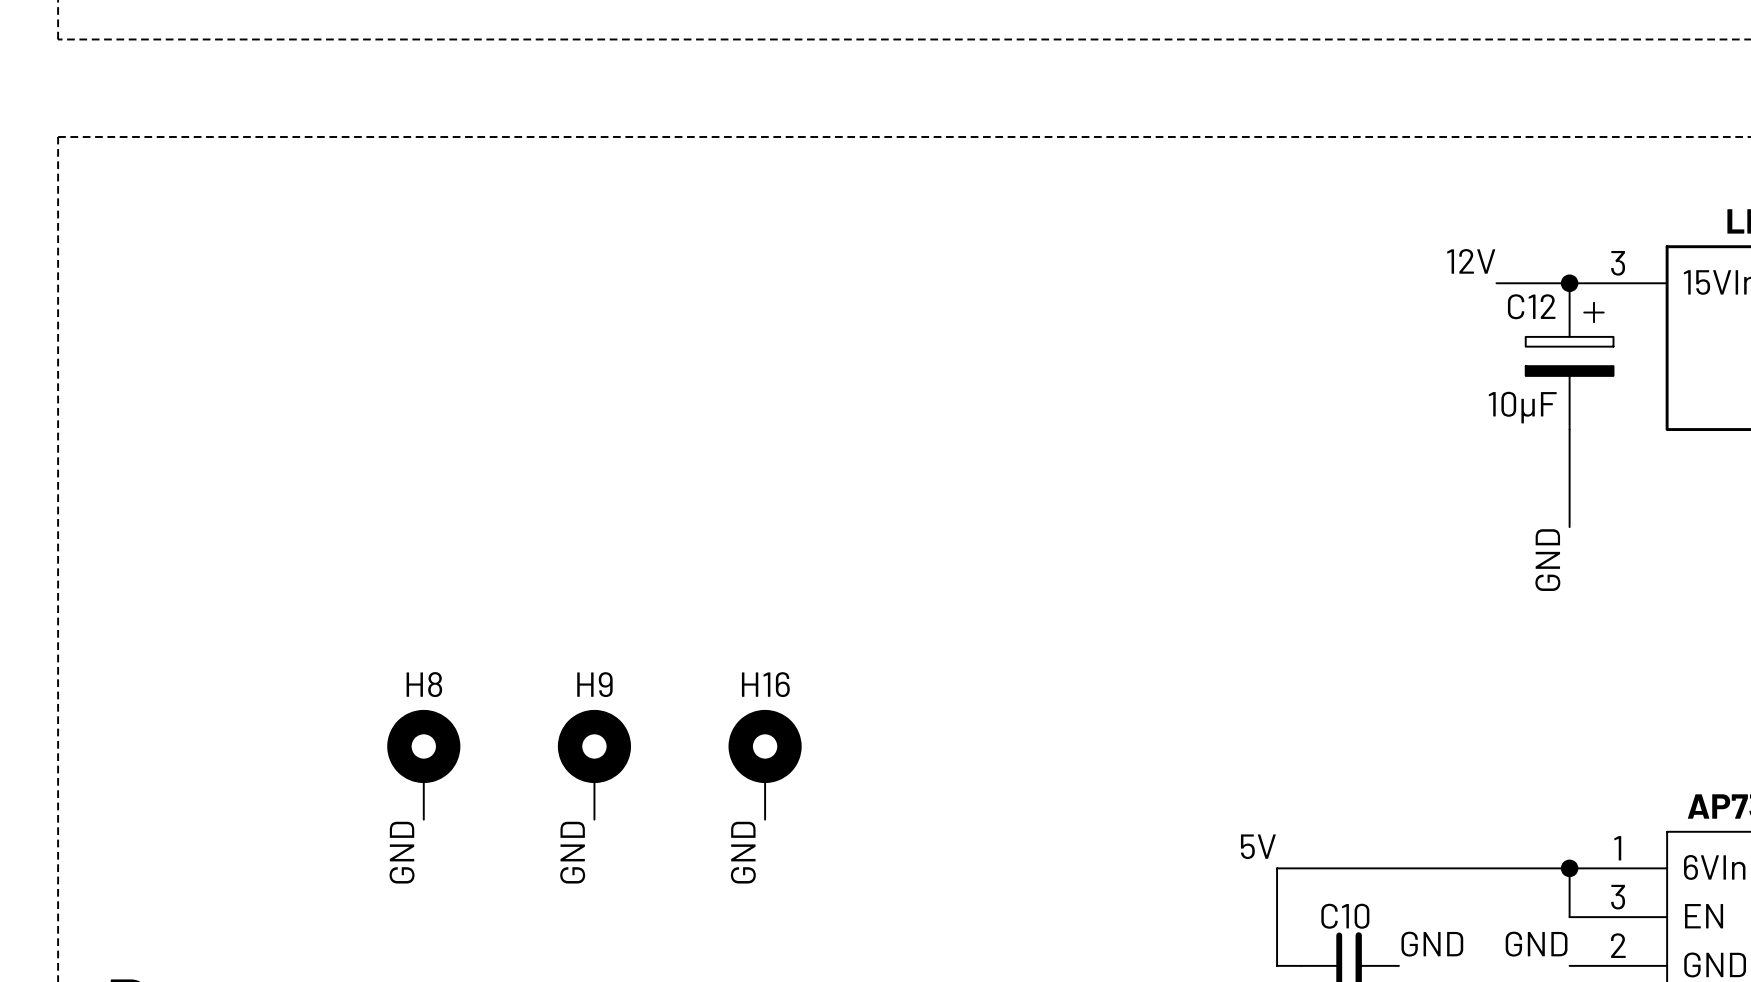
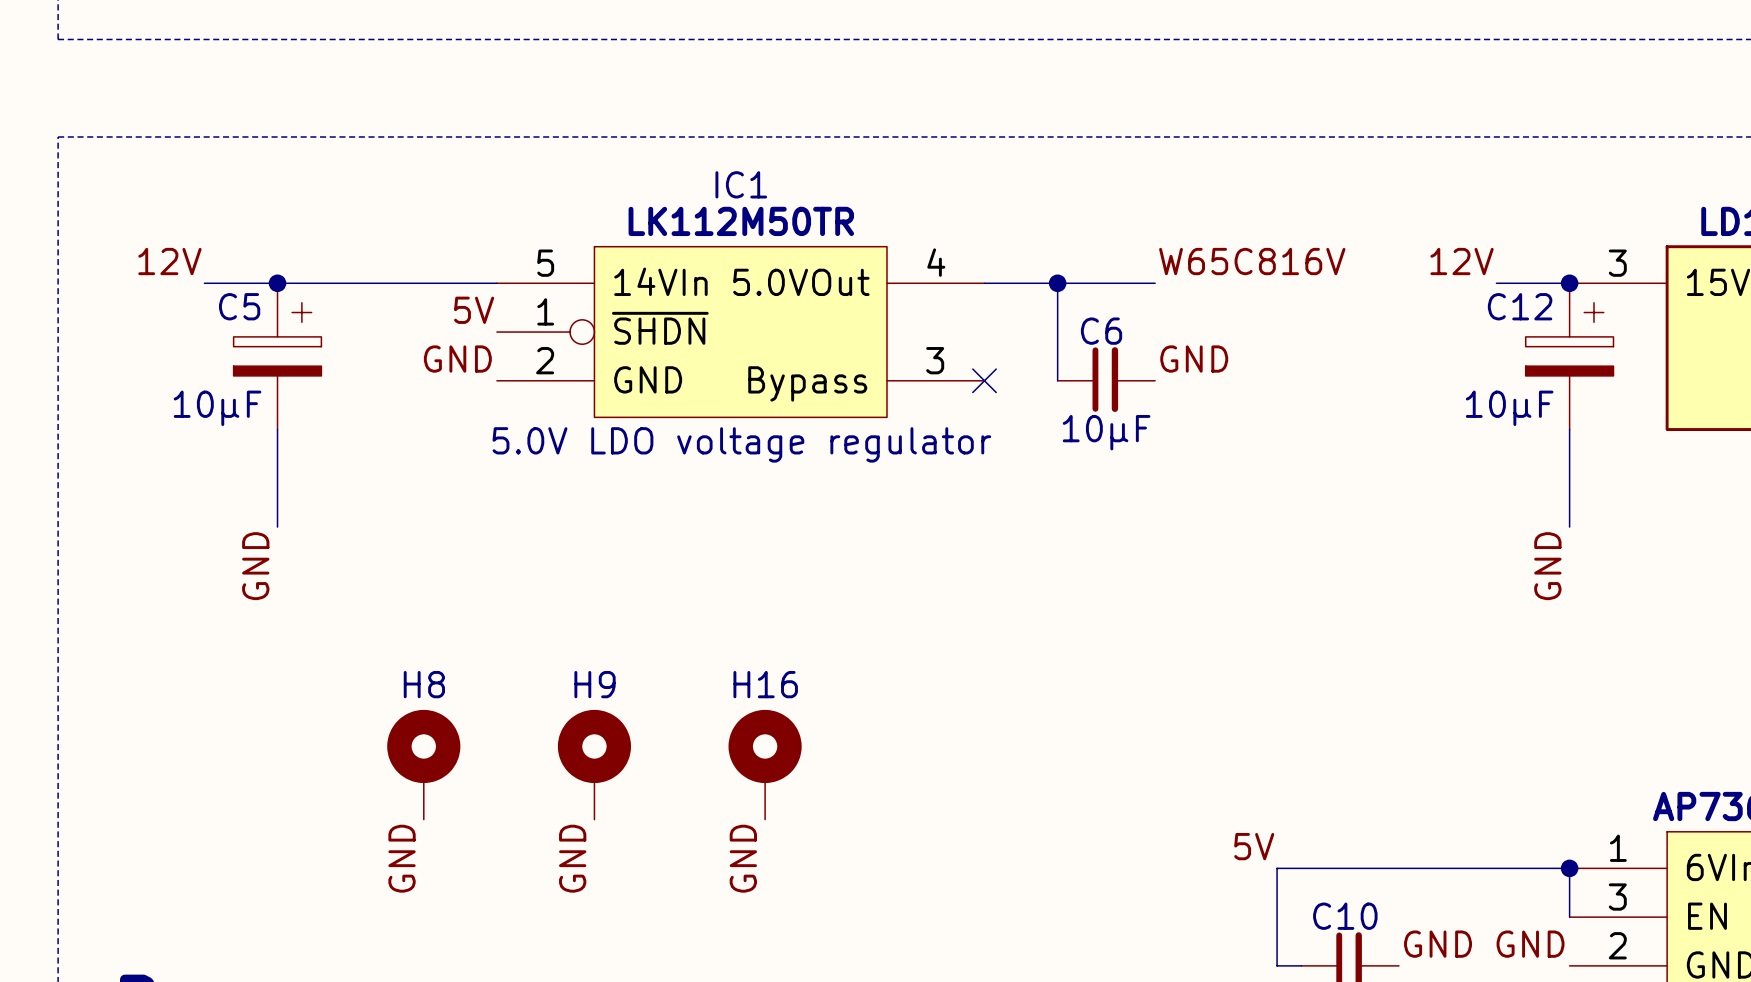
label: none -> 12V (169, 261)
label: none -> W65C816V (1252, 261)
wire: none -> (204, 283) (496, 283)
junction: none -> (277, 283)
wire: none -> (984, 283) (1155, 283)
wire: none -> (1057, 283) (1057, 380)
junction: none -> (1057, 283)
label: none -> 5V (474, 310)
IC1: none -> LK112M50TR (740, 332)
C5: none -> 10μF (277, 356)
label: none -> GND (457, 359)
label: none -> GND (1194, 359)
C6: none -> 10µF (1106, 379)
no-connect mark: none -> (984, 380)
wire: none -> (277, 429) (277, 527)
label: none -> GND (255, 566)

